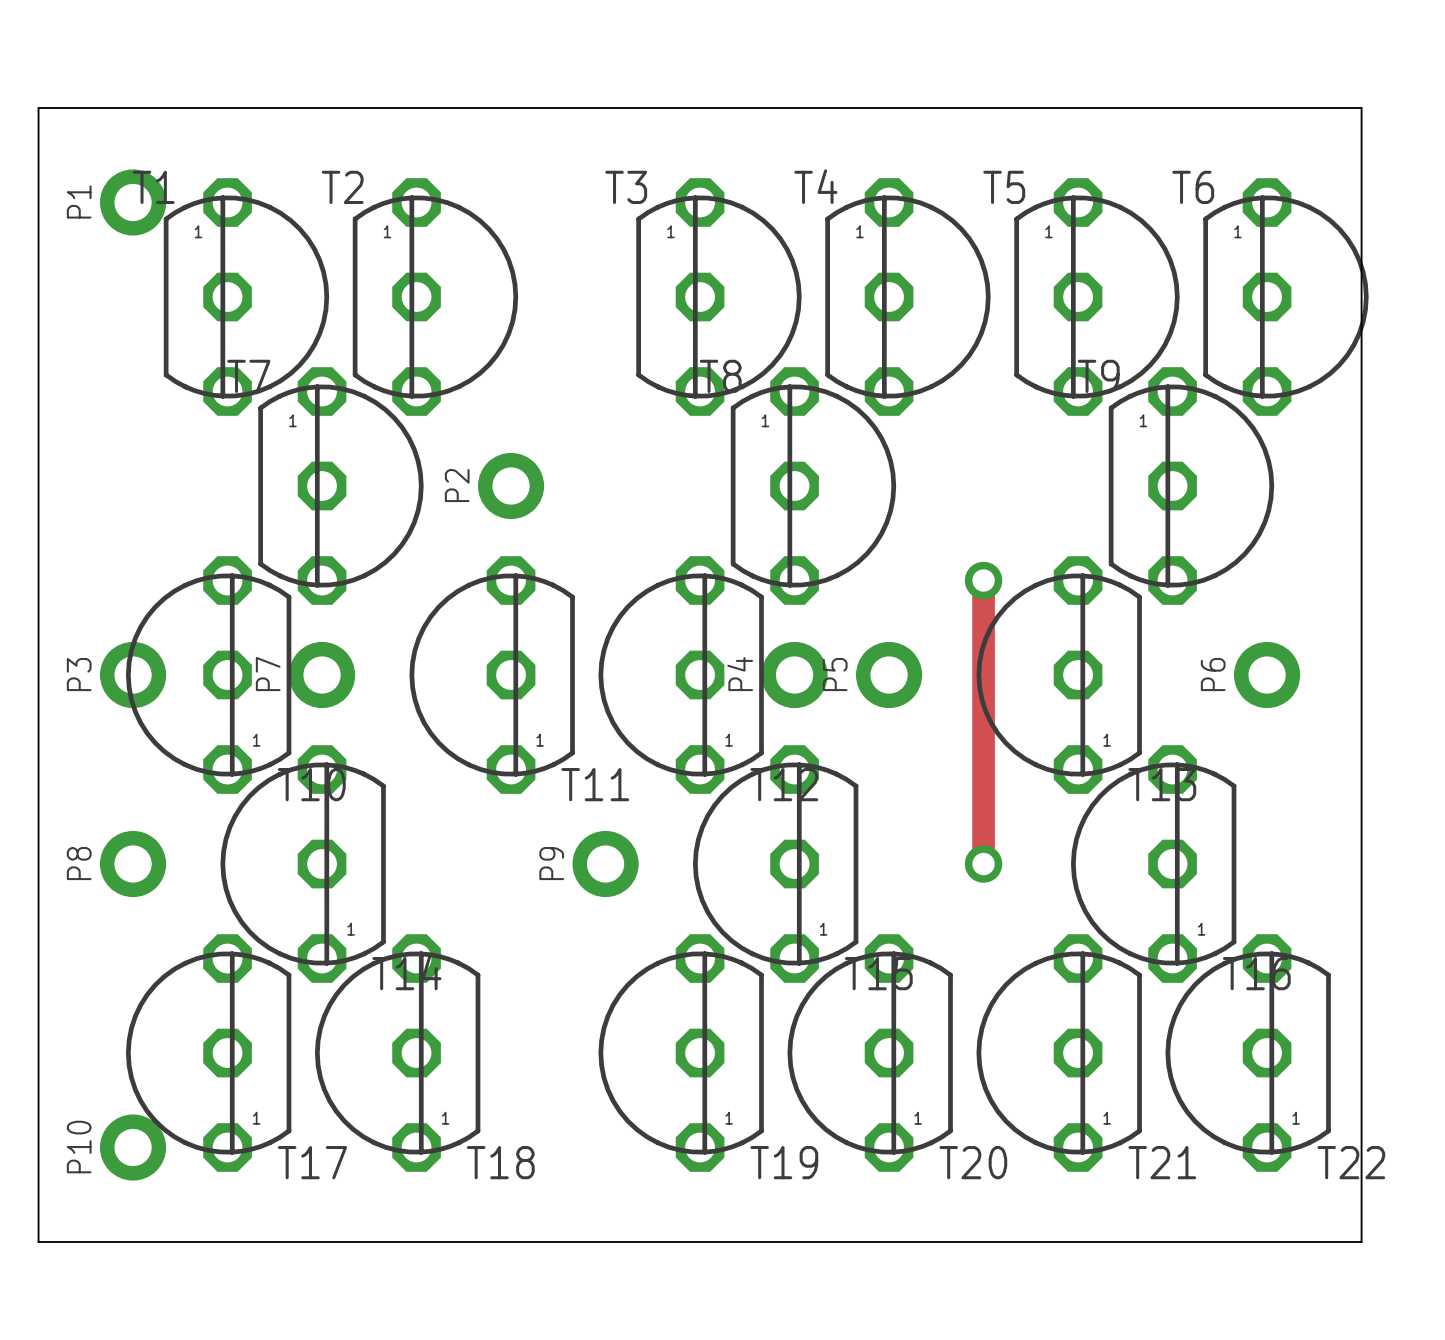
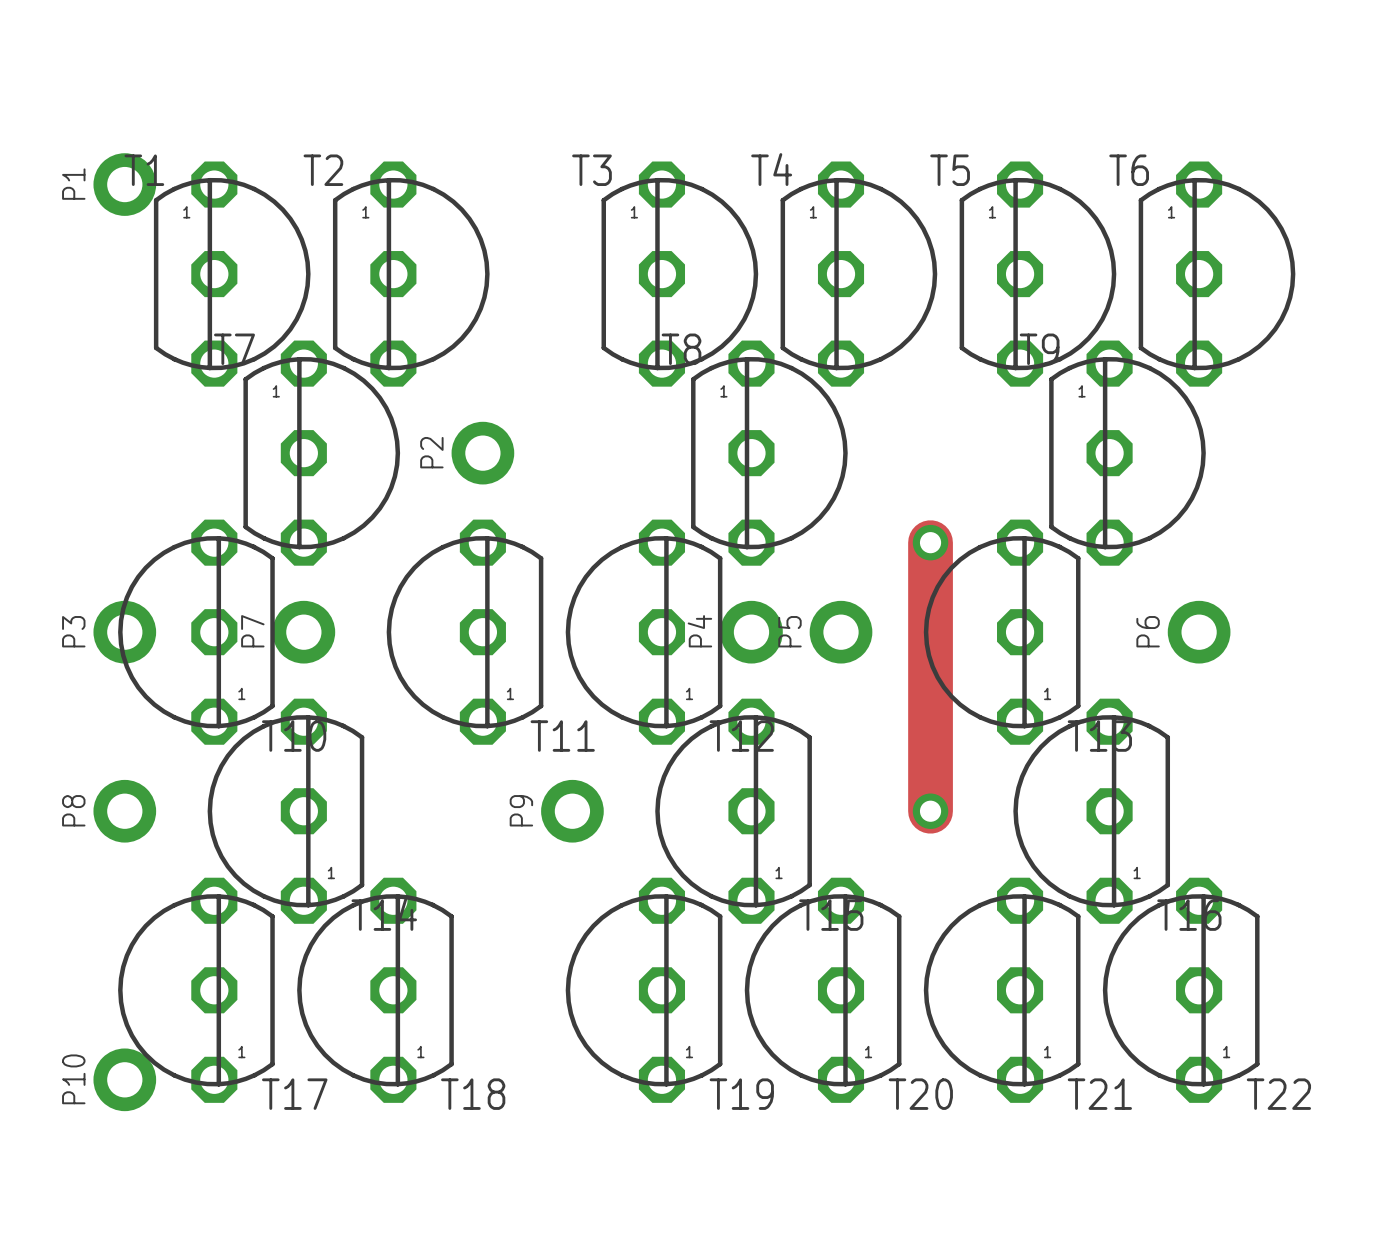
board edge: (38, 108) (1361, 108) (1361, 1242) (38, 1242) (38, 108) -> none
track width: thin (983, 580) (983, 864) -> thick (930, 542) (930, 811)

